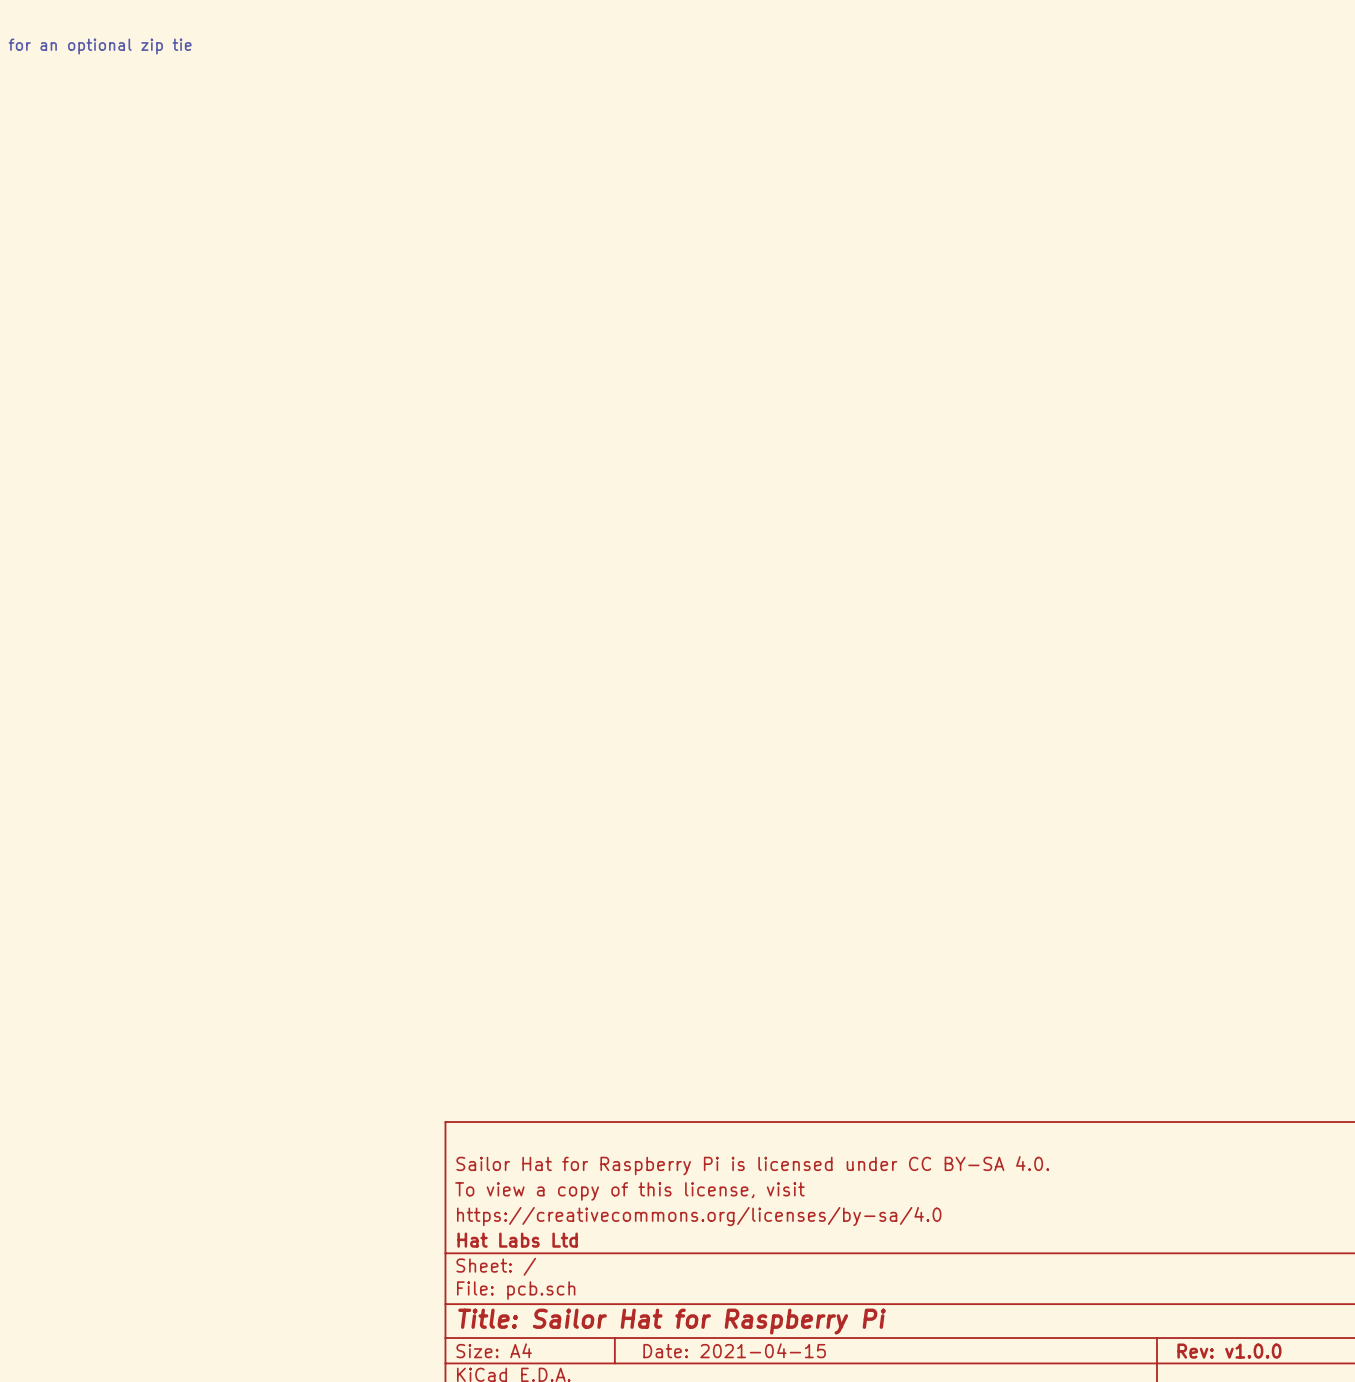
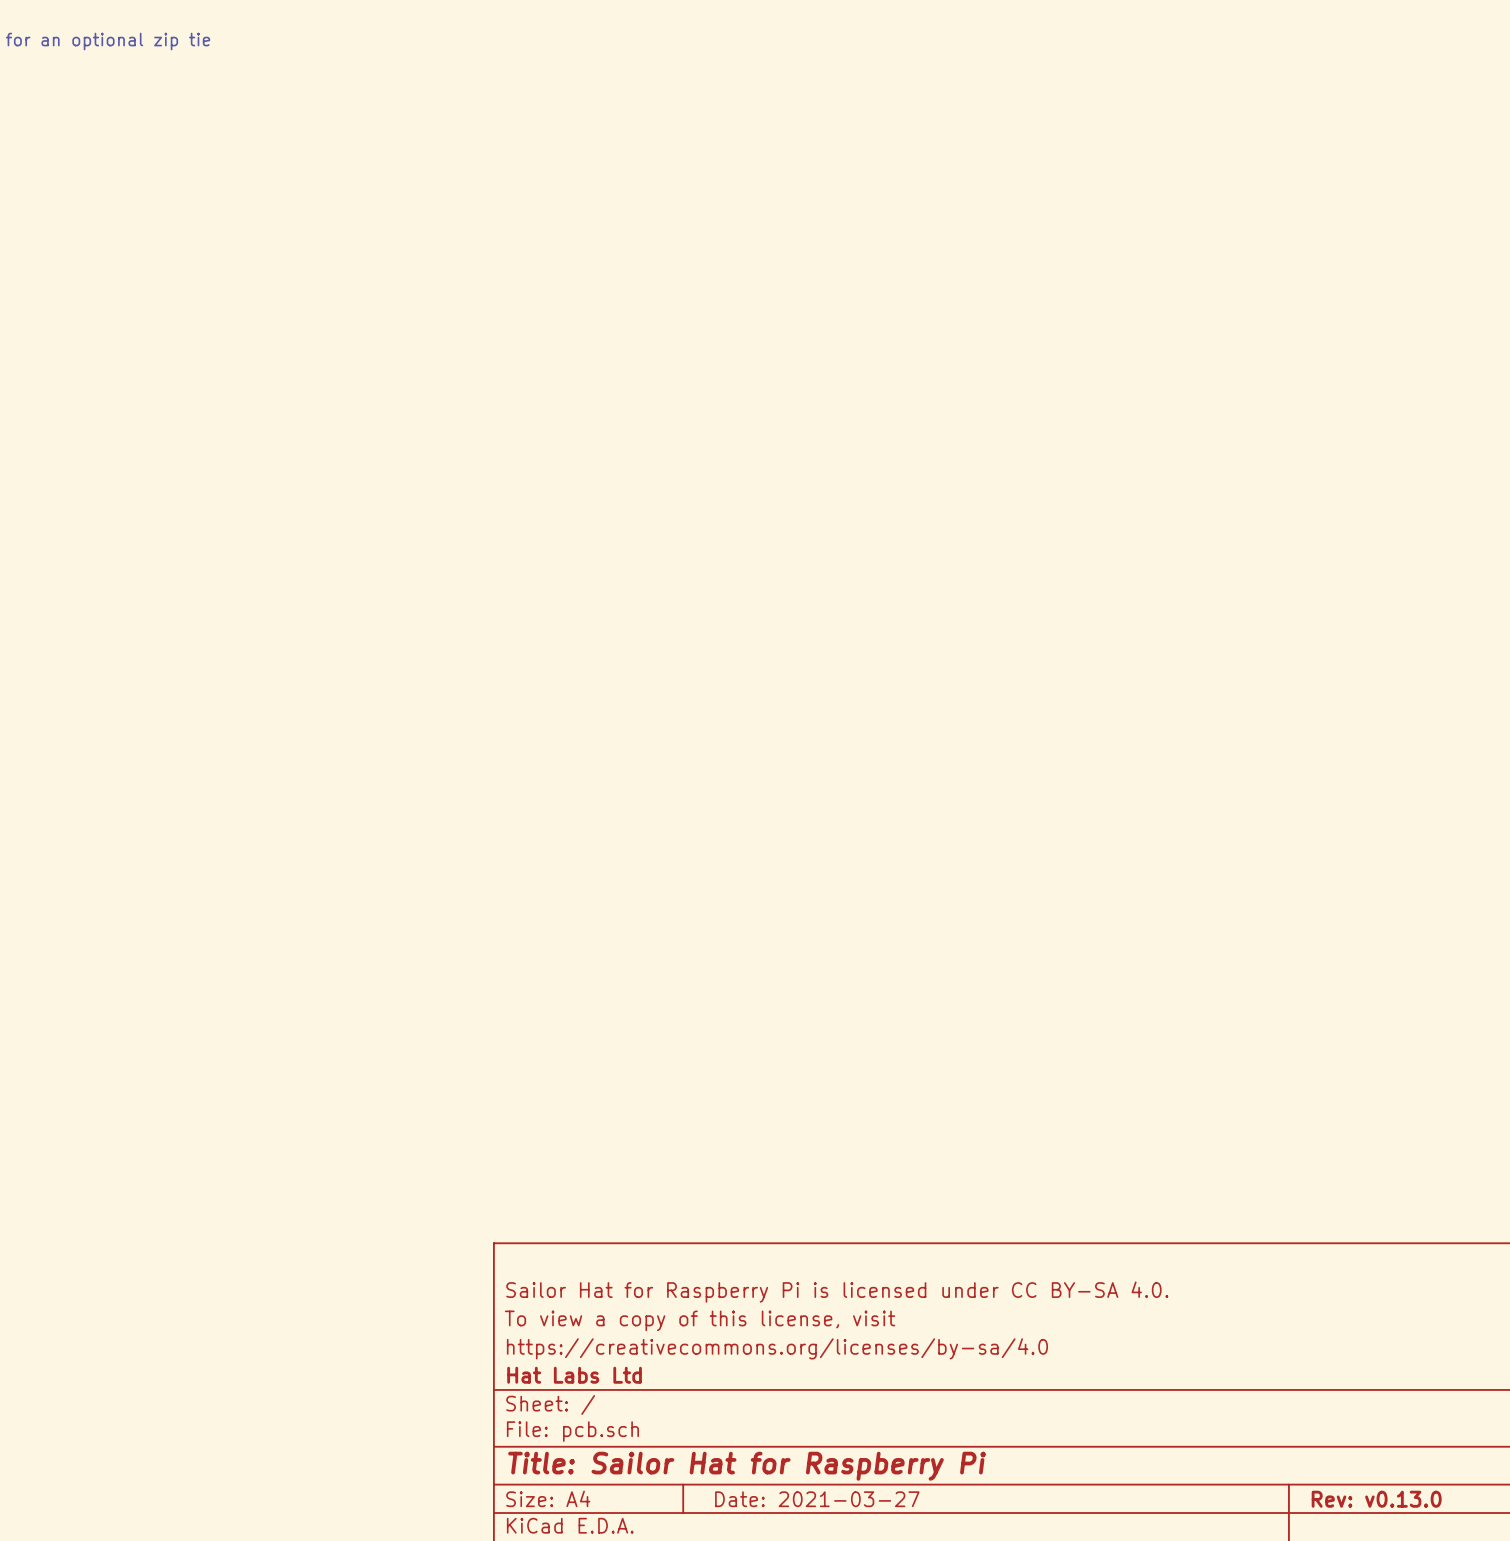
title block: Date: 2021-04-15 (734, 1350) -> Date: 2021-03-27 (817, 1499)
title block: Rev: v1.0.0 (1229, 1351) -> Rev: v0.13.0 (1376, 1499)

